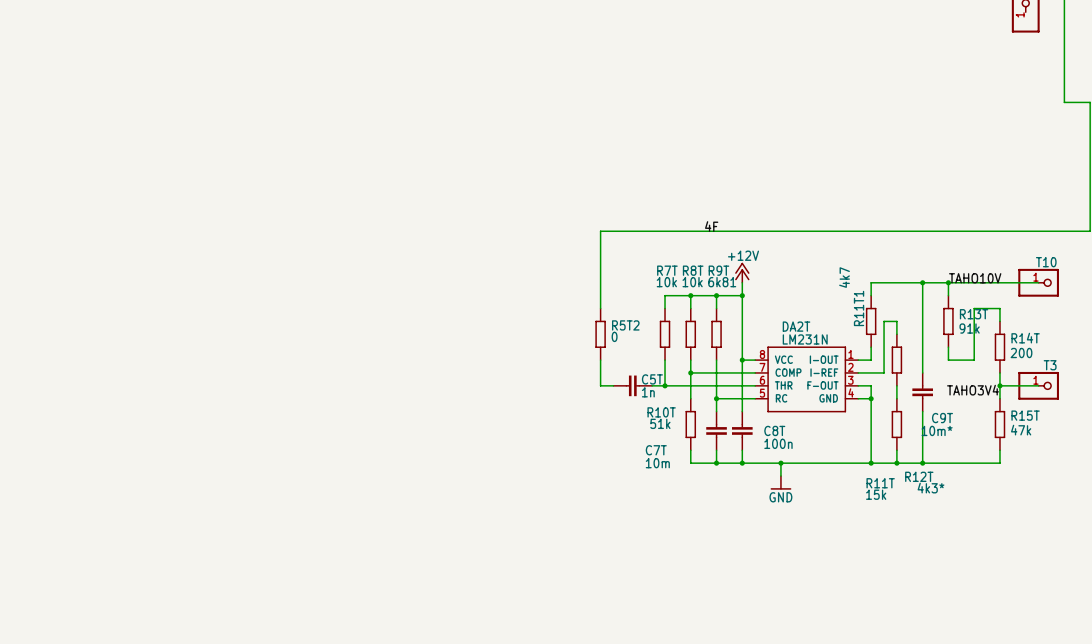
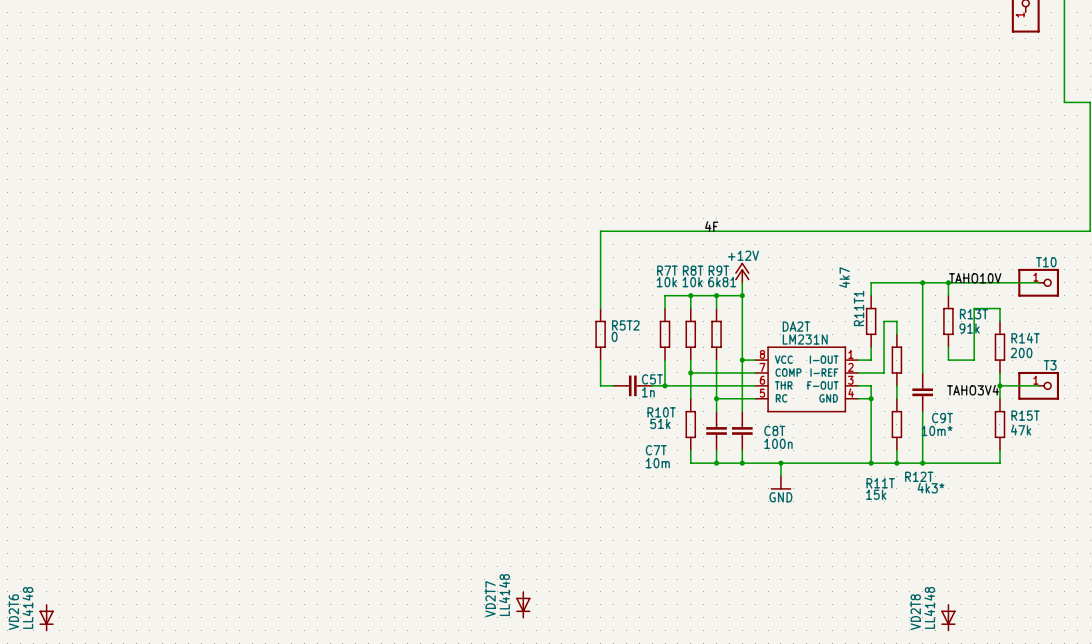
VD2T7: none -> LL4148 (523, 604)
VD2T6: none -> LL4148 (46, 617)
VD2T8: none -> LL4148 (948, 617)

